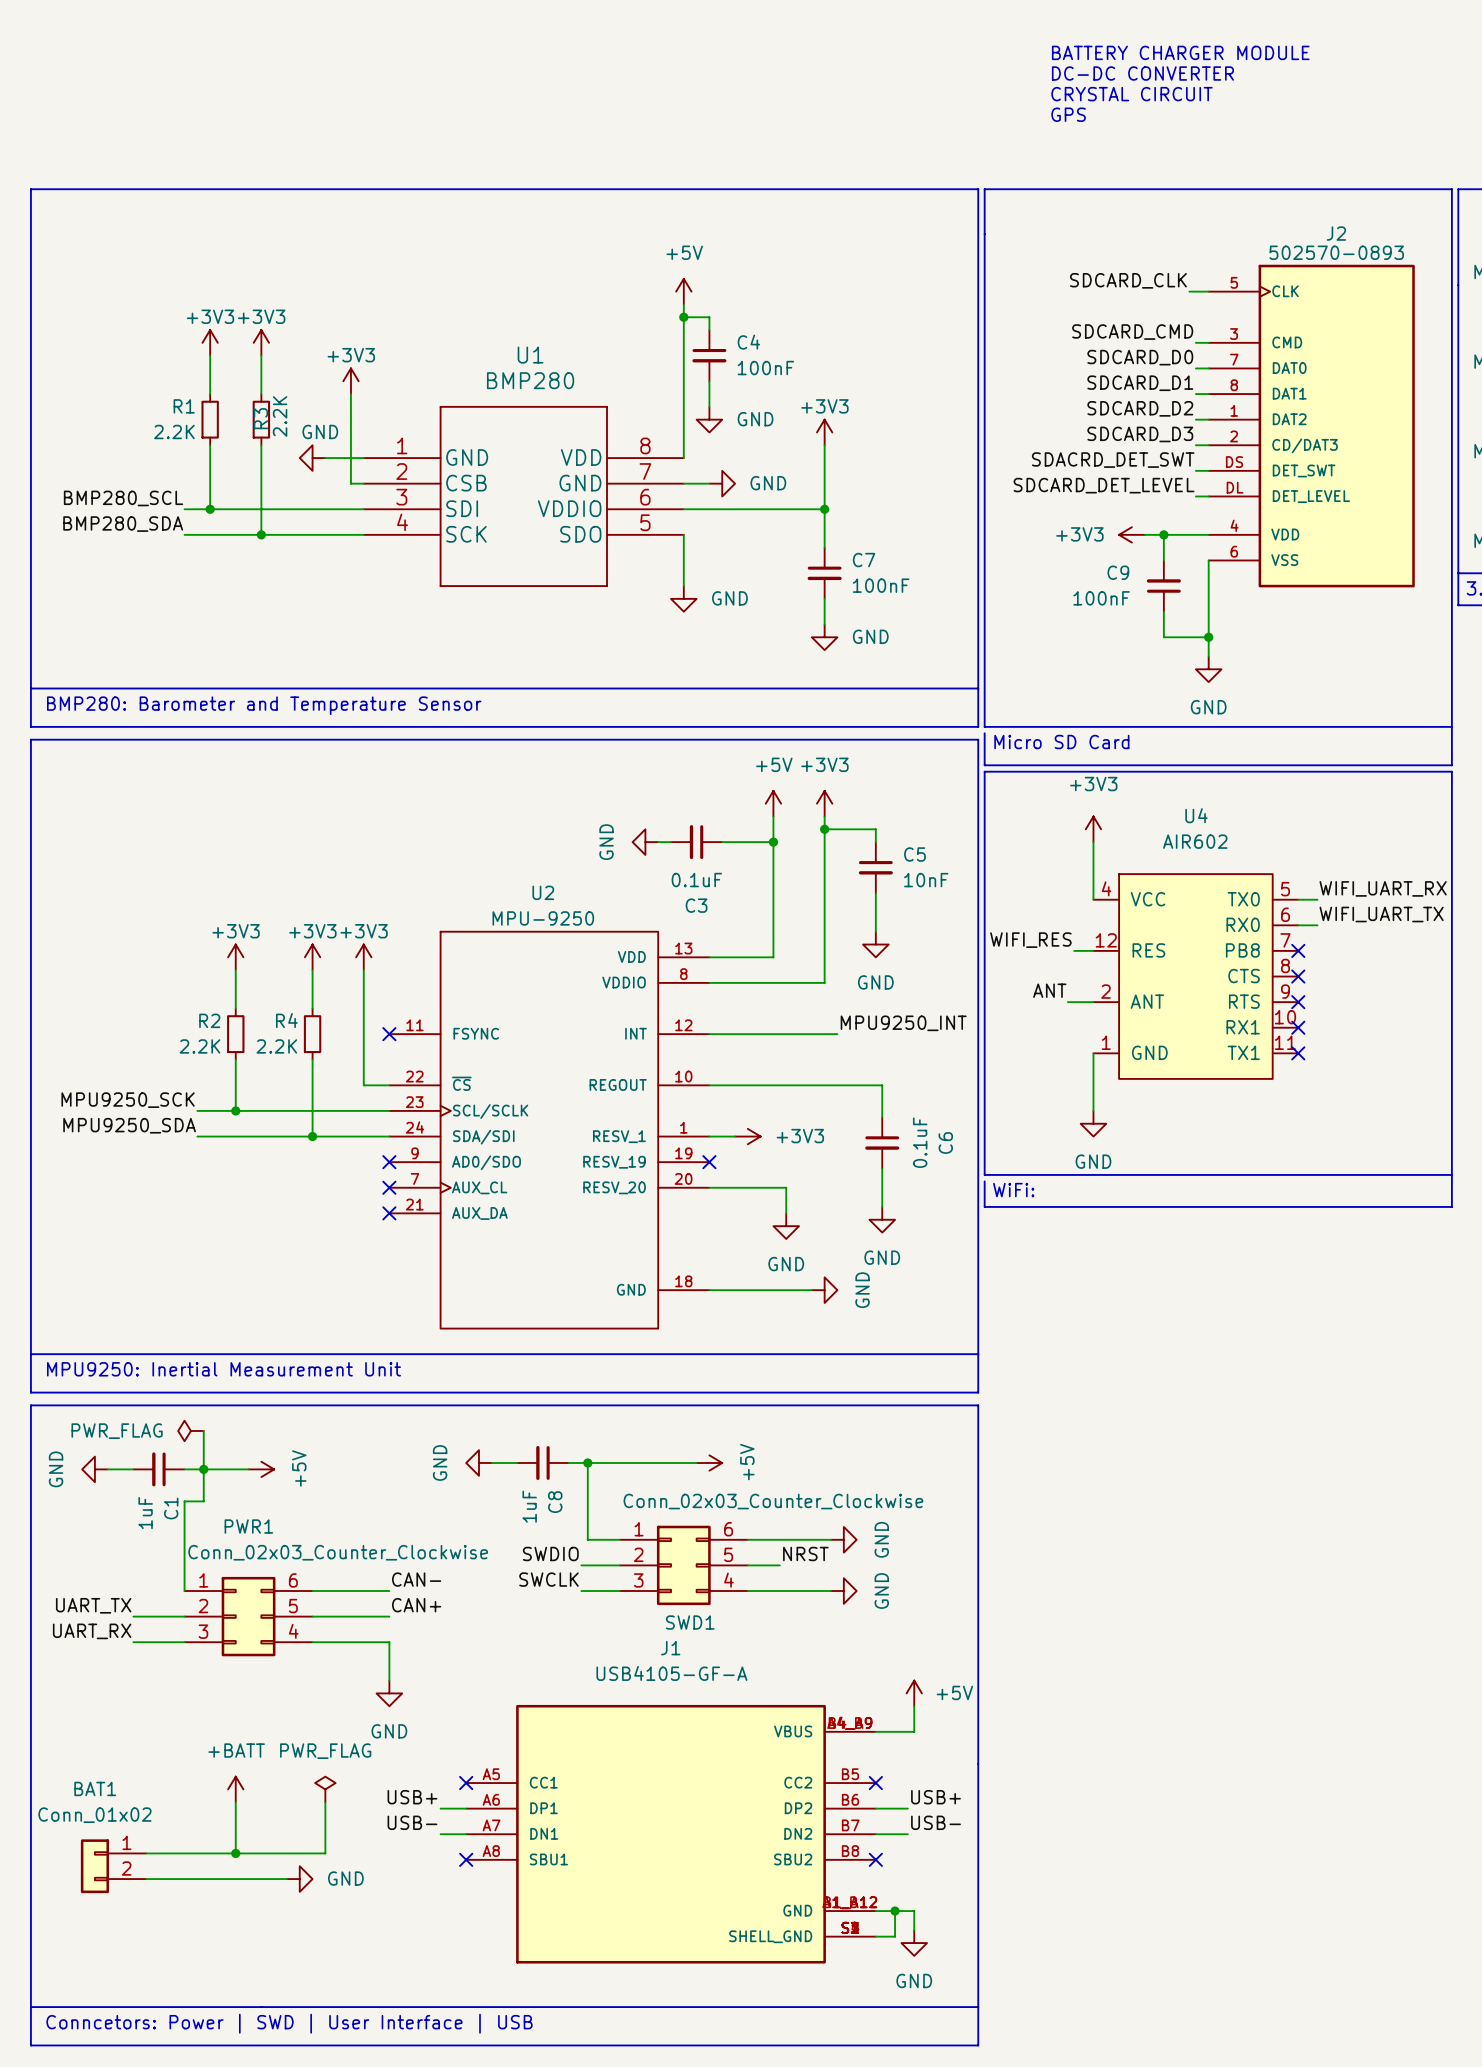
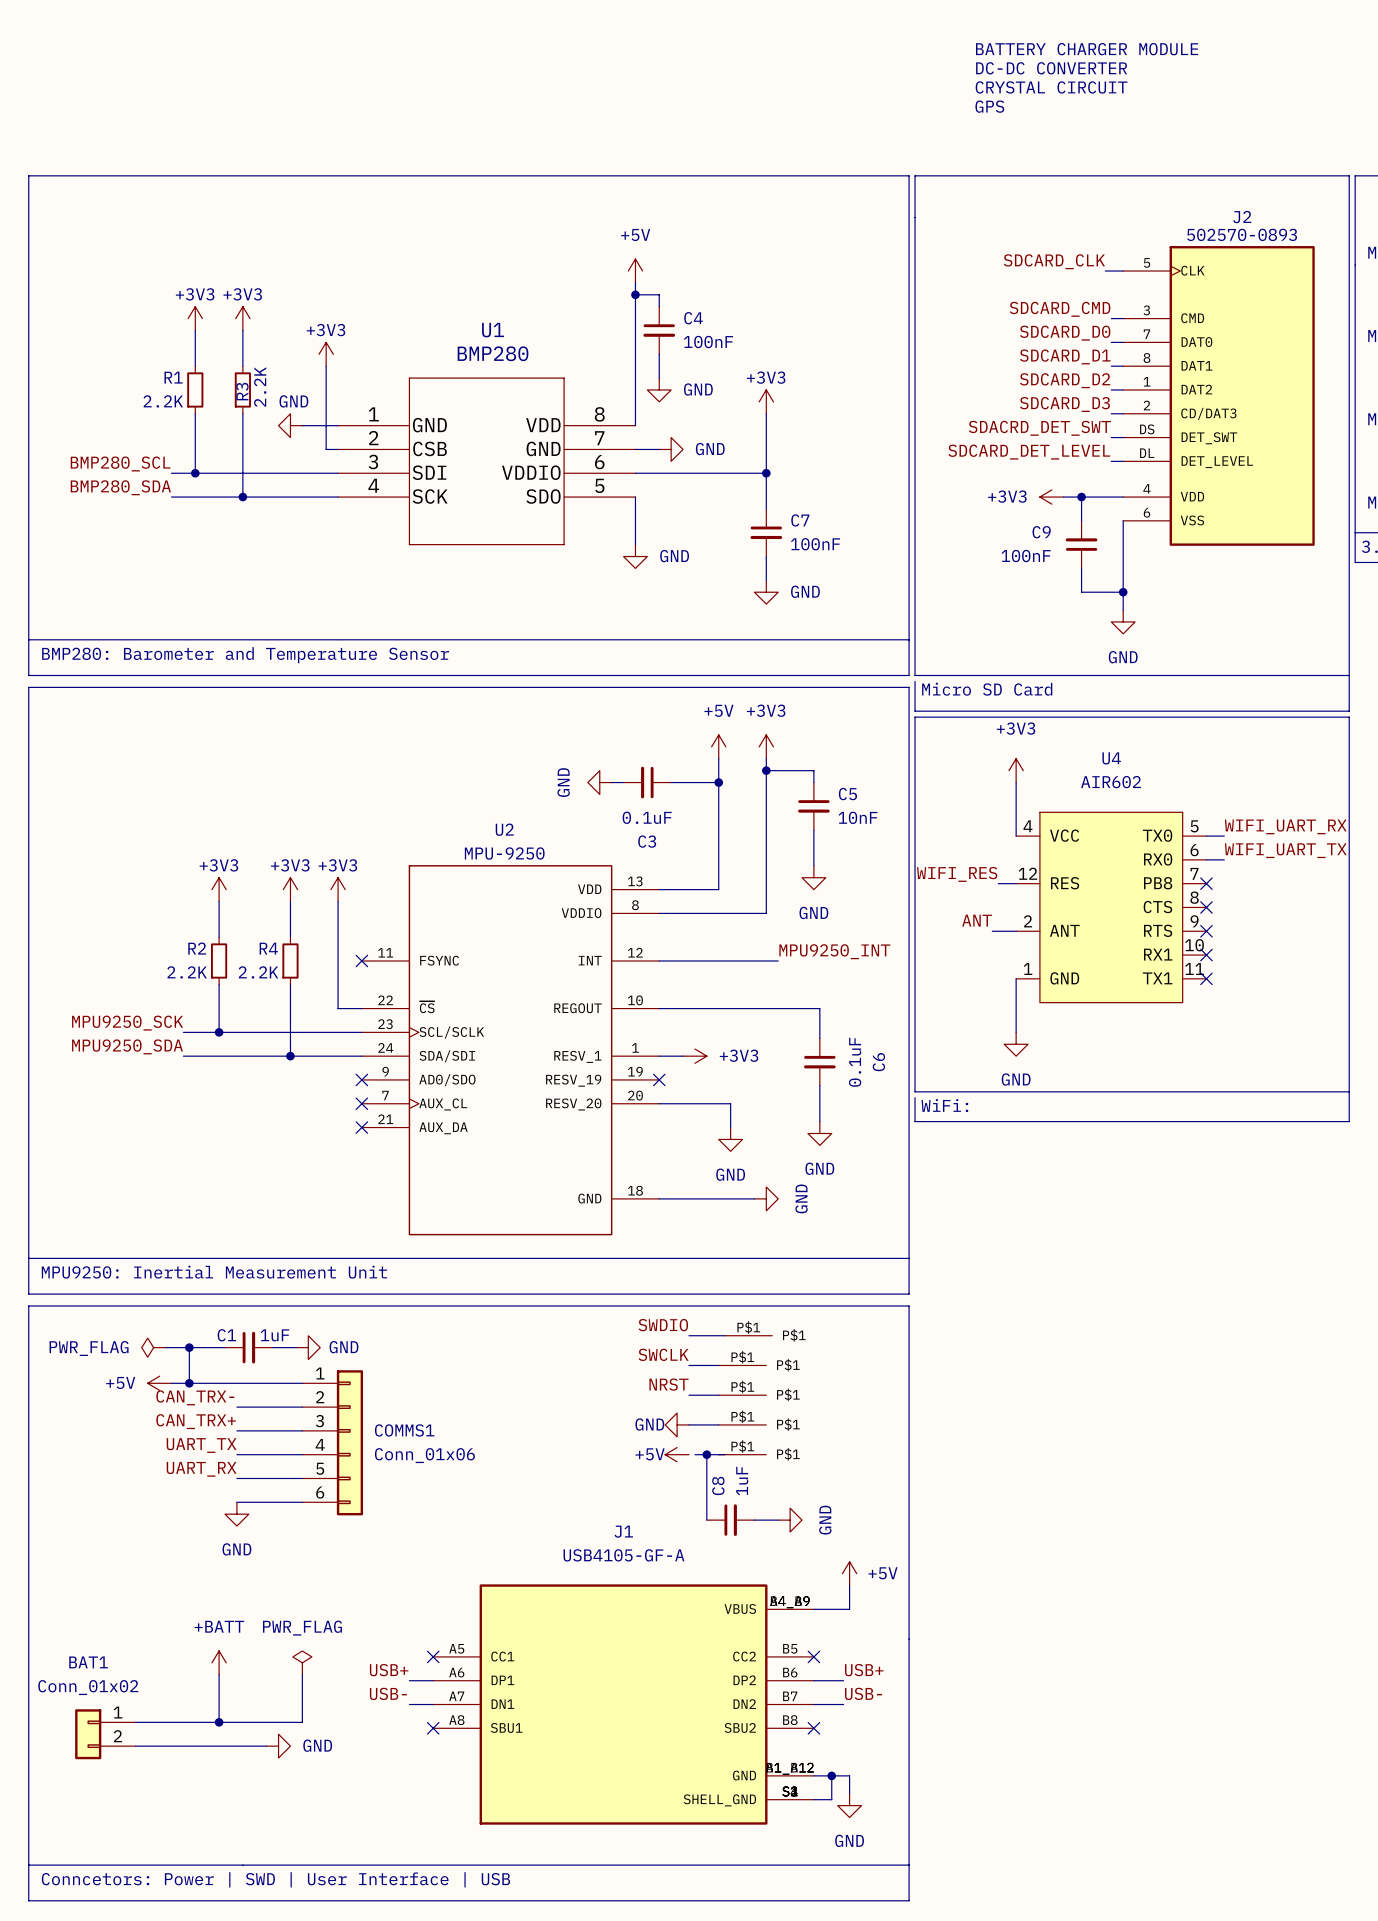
power symbol position: PWR_FLAG (190, 1430) -> PWR_FLAG (153, 1347)
wire: (203, 1430) (203, 1450) -> none
part: none -> (748, 1335)
junction: none -> (189, 1347)
power symbol: none -> GND (308, 1347)
power symbol: GND (478, 1462) -> none
wire: (491, 1462) (517, 1462) -> none
C8 rotation: 0° (542, 1462) -> 180° (730, 1520)
C8 position: (543, 1462) -> (730, 1520)
wire: (568, 1462) (696, 1462) -> none
wire: (587, 1462) (587, 1539) (619, 1539) -> none
junction: (587, 1462) -> none
power symbol rotation: 0° (709, 1462) -> 180° (677, 1454)
power symbol position: +5V (709, 1462) -> +5V (677, 1454)
power symbol: GND (94, 1469) -> none
wire: (107, 1469) (133, 1469) -> (272, 1347) (296, 1347)
C1 rotation: 0° (158, 1469) -> 180° (248, 1347)
C1 position: (158, 1469) -> (248, 1347)
wire: (184, 1469) (248, 1469) -> (165, 1347) (225, 1347)
junction: (203, 1469) -> none
power symbol rotation: 0° (261, 1469) -> 180° (159, 1383)
power symbol position: +5V (261, 1469) -> +5V (159, 1383)
wire: none -> (688, 1365) (718, 1365)
part: none -> (742, 1365)
wire: none -> (171, 1383) (302, 1383)
wire: (203, 1488) (203, 1501) (184, 1501) (184, 1591) -> none
junction: none -> (189, 1383)
wire: none -> (688, 1395) (718, 1395)
part: none -> (742, 1395)
label: none -> CAN_TRX- (195, 1397)
C1 name position: C1 (171, 1508) -> C1 (226, 1335)
C1 value position: 1uF (145, 1513) -> 1uF (274, 1335)
wire: none -> (236, 1407) (302, 1407)
label: none -> CAN_TRX+ (196, 1421)
power symbol: none -> GND (677, 1424)
wire: none -> (688, 1424) (718, 1424)
part: none -> (742, 1424)
wire: none -> (236, 1430) (302, 1430)
wire: (747, 1539) (831, 1539) -> none
power symbol: GND (843, 1539) -> none
COMMS1: none -> Conn_01x06 (332, 1442)
label position: SWDIO (550, 1553) -> SWDIO (663, 1325)
label position: NRST (805, 1553) -> NRST (669, 1384)
wire: none -> (236, 1454) (302, 1454)
wire: (581, 1565) (619, 1565) -> (688, 1335) (724, 1335)
SWD1: Conn_02x03_Counter_Clockwise (683, 1565) -> none
wire: none -> (706, 1454) (706, 1520)
junction: none -> (706, 1454)
part: none -> (742, 1454)
label: CAN- (416, 1579) -> none
label position: SWCLK (549, 1579) -> SWCLK (663, 1354)
wire: (581, 1591) (619, 1591) -> none
wire: (747, 1591) (831, 1591) -> none
power symbol position: GND (843, 1591) -> GND (790, 1520)
label position: UART_TX (93, 1605) -> UART_TX (201, 1445)
label: CAN+ (416, 1605) -> none
wire: (133, 1616) (184, 1616) -> none
PWR1: Conn_02x03_Counter_Clockwise (248, 1616) -> none
power symbol: none -> GND (236, 1514)
label position: UART_RX (92, 1631) -> UART_RX (201, 1469)
wire: none -> (754, 1520) (778, 1520)
wire: (133, 1642) (184, 1642) -> none
wire: (312, 1642) (389, 1642) (389, 1680) -> none
power symbol: GND (389, 1693) -> none

